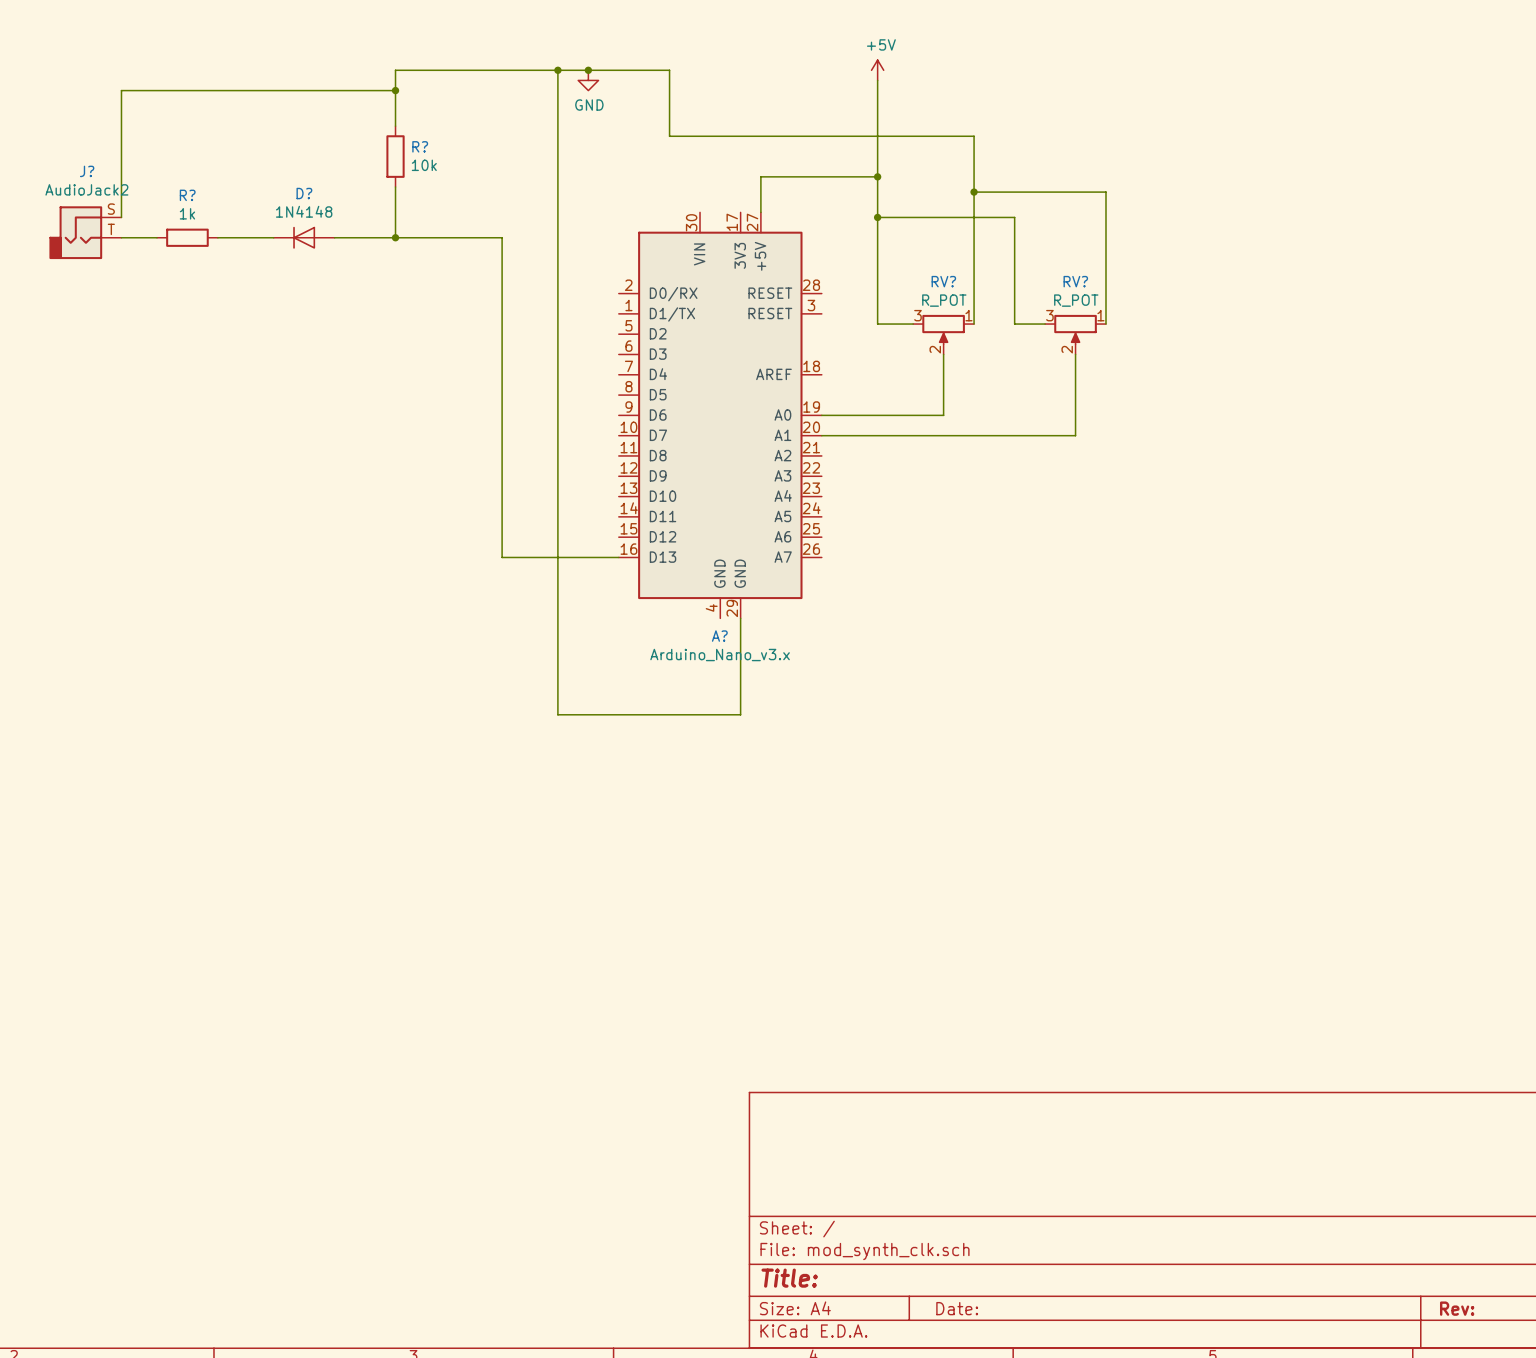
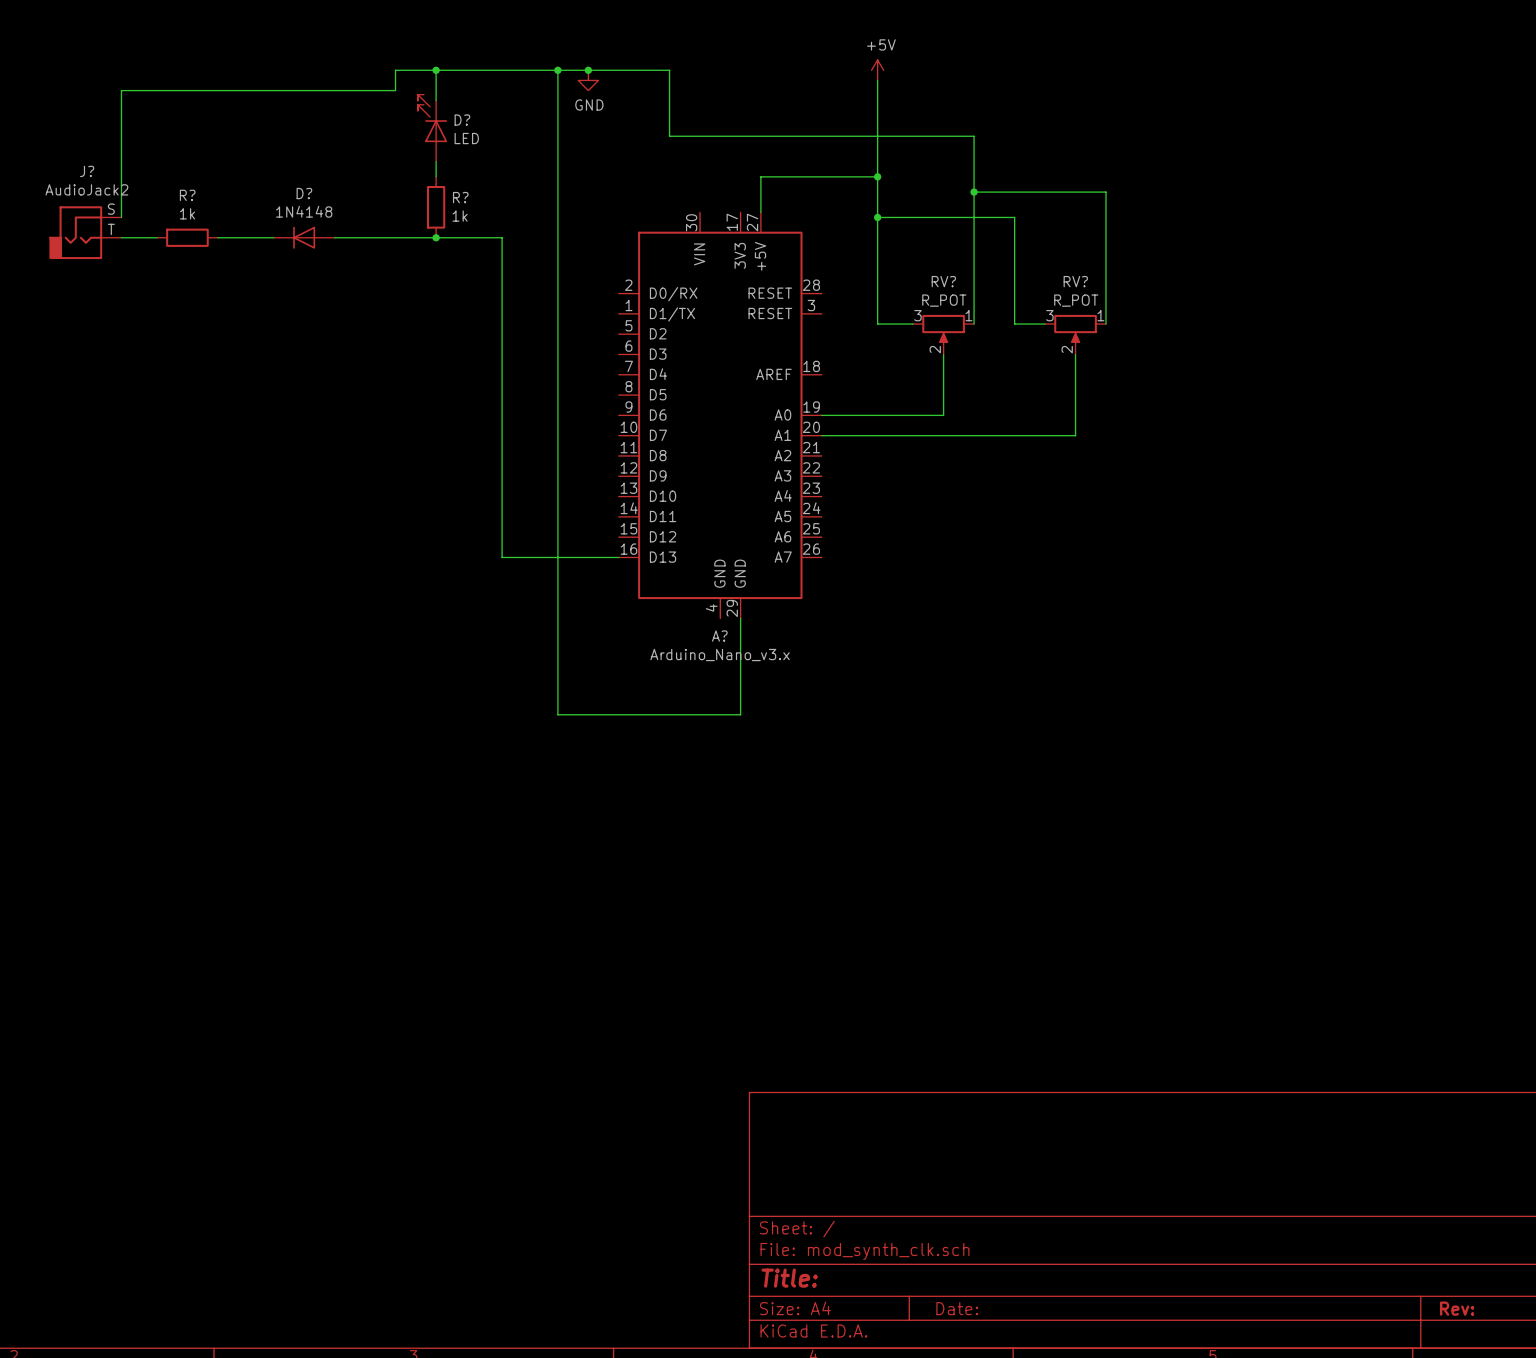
wire: none -> (436, 70) (436, 100)
wire: (395, 90) (395, 126) -> none
junction position: (395, 90) -> (436, 70)
D?: none -> LED (432, 128)
R?: 10k (395, 156) -> none
wire: none -> (436, 161) (436, 176)
wire: (395, 187) (395, 237) -> none
R?: none -> 1k (436, 207)
junction position: (395, 237) -> (436, 237)

